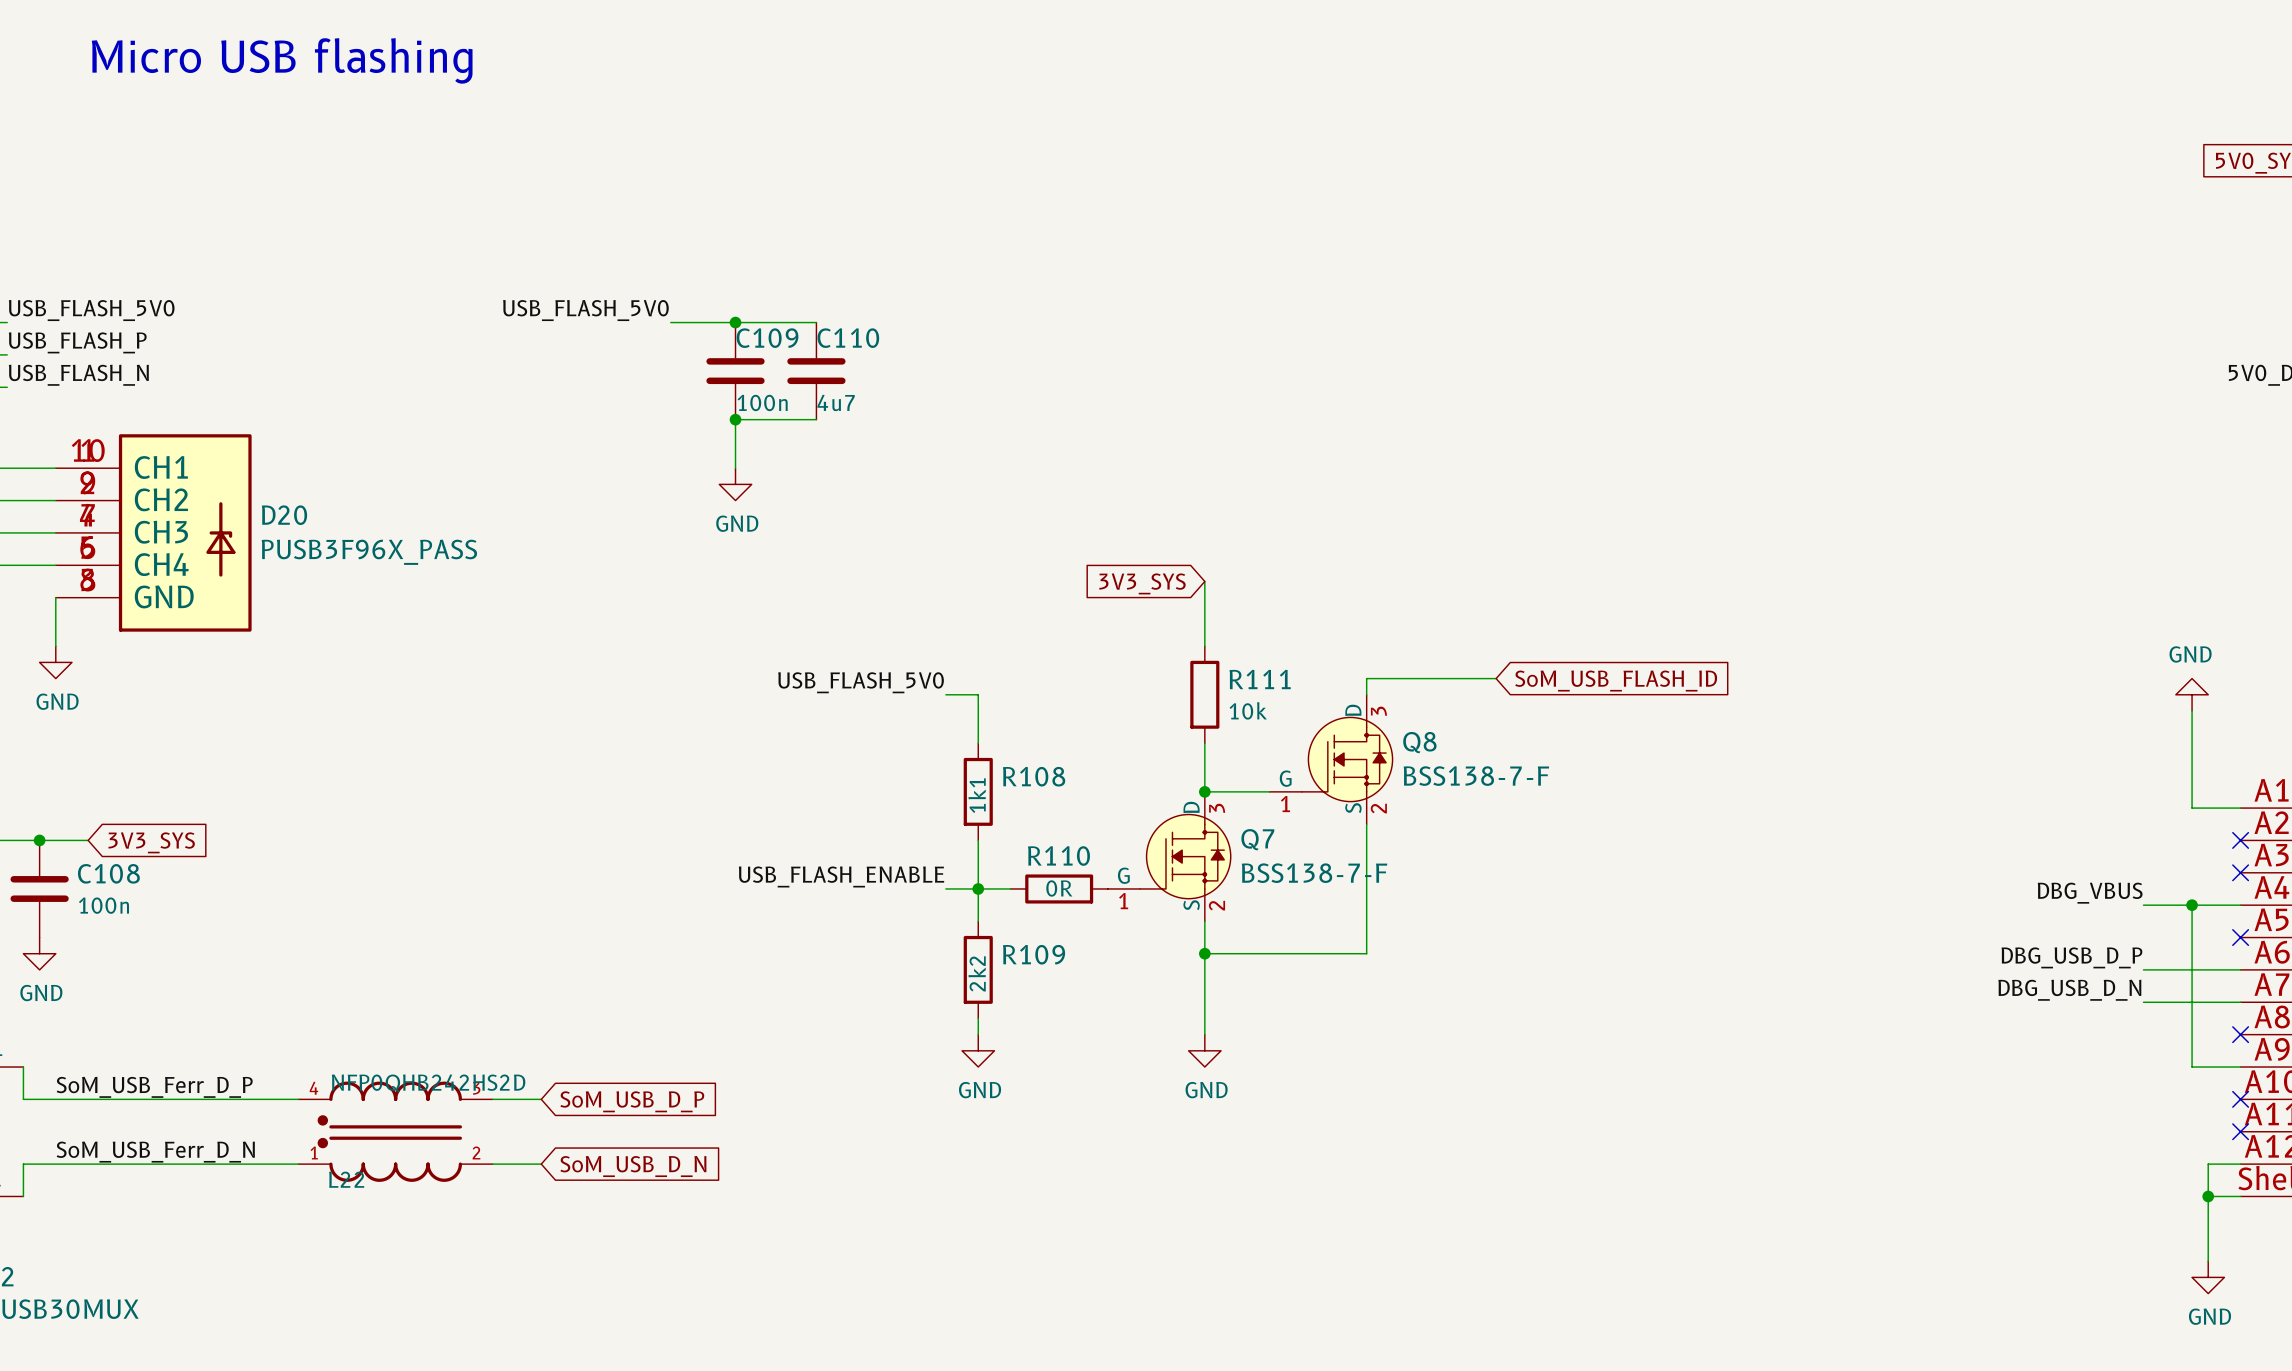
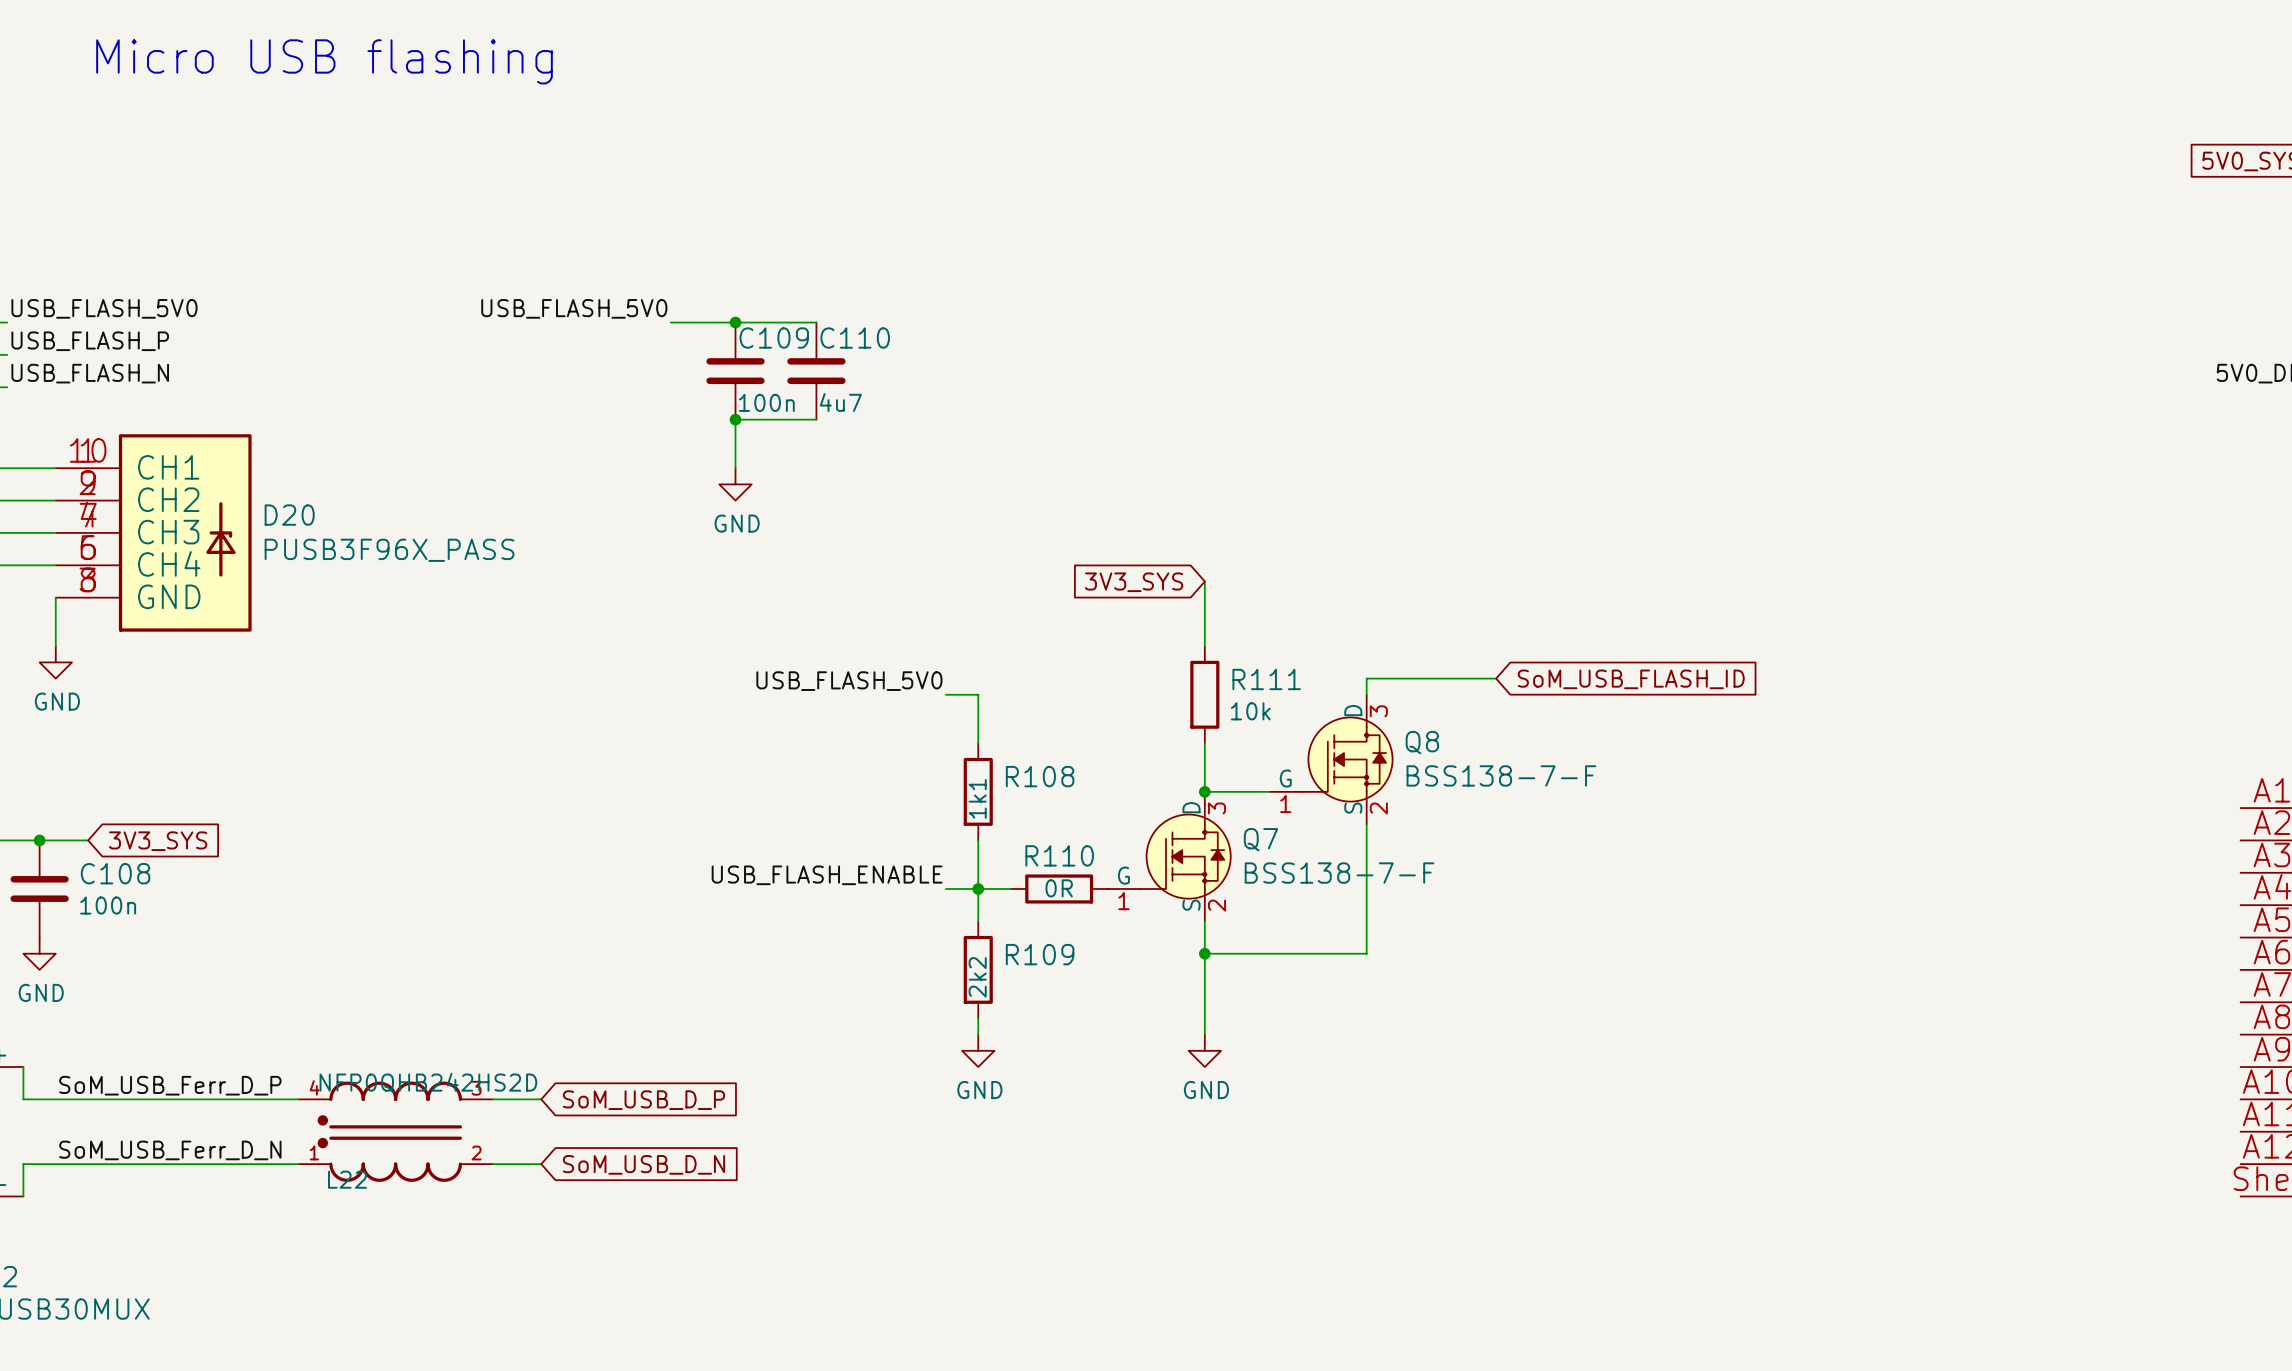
power symbol: GND (2192, 694) -> none
wire: (2192, 710) (2192, 808) (2240, 808) -> none
no-connect mark: (2240, 840) -> none
no-connect mark: (2240, 872) -> none
label: DBG_VBUS (2090, 893) -> none
wire: (2143, 905) (2240, 905) -> none
wire: (2192, 905) (2192, 1067) (2240, 1067) -> none
junction: (2192, 905) -> none
no-connect mark: (2240, 937) -> none
label: DBG_USB_D_P (2071, 957) -> none
wire: (2143, 969) (2240, 969) -> none
label: DBG_USB_D_N (2069, 990) -> none
wire: (2143, 1002) (2240, 1002) -> none
no-connect mark: (2240, 1034) -> none
no-connect mark: (2240, 1099) -> none
no-connect mark: (2240, 1131) -> none
wire: (2240, 1164) (2208, 1164) (2208, 1261) -> none
wire: (2208, 1196) (2240, 1196) -> none
junction: (2208, 1196) -> none
power symbol: GND (2208, 1277) -> none

